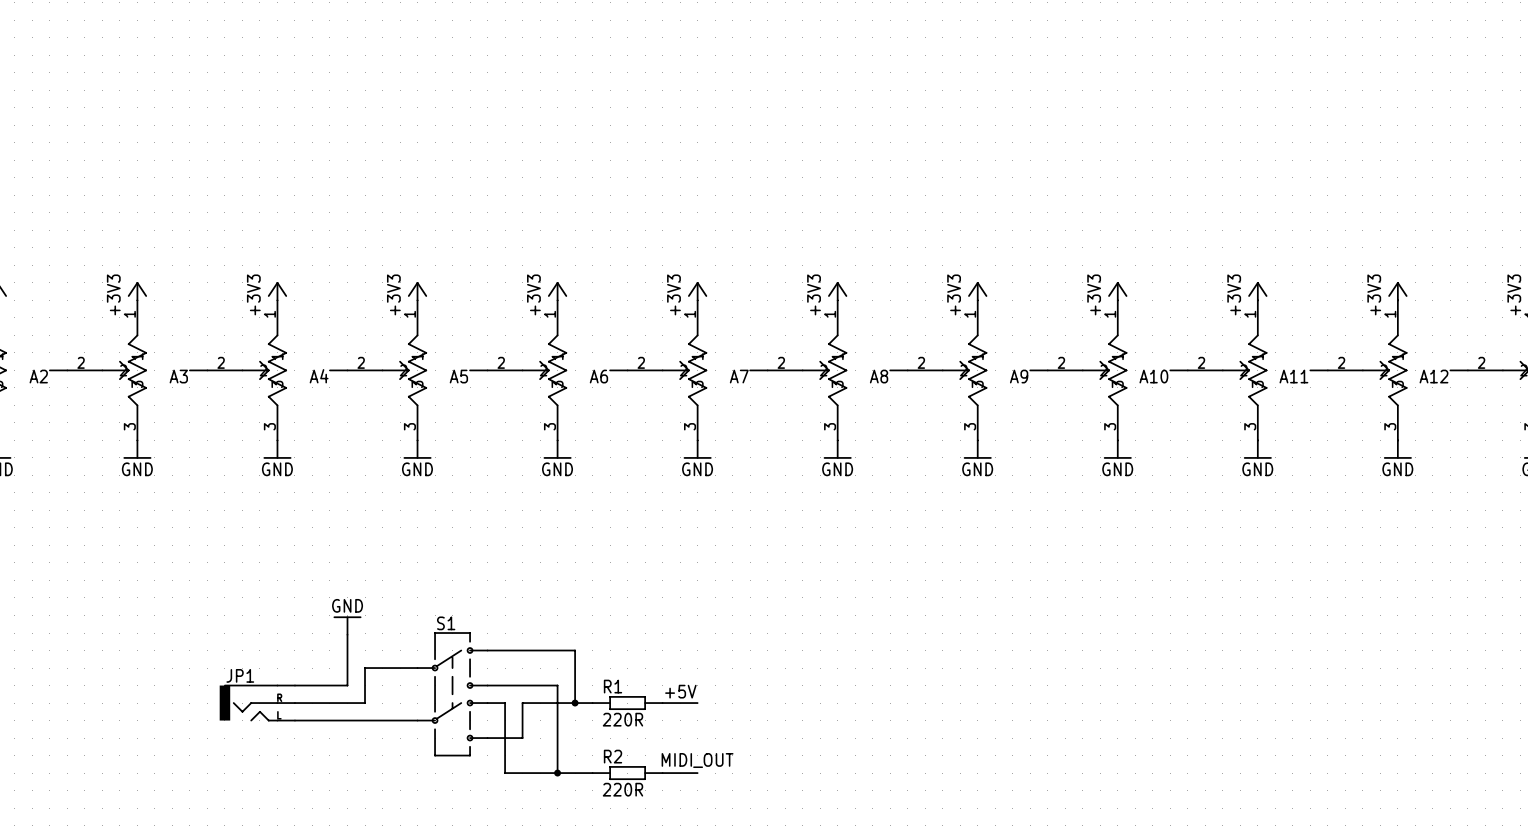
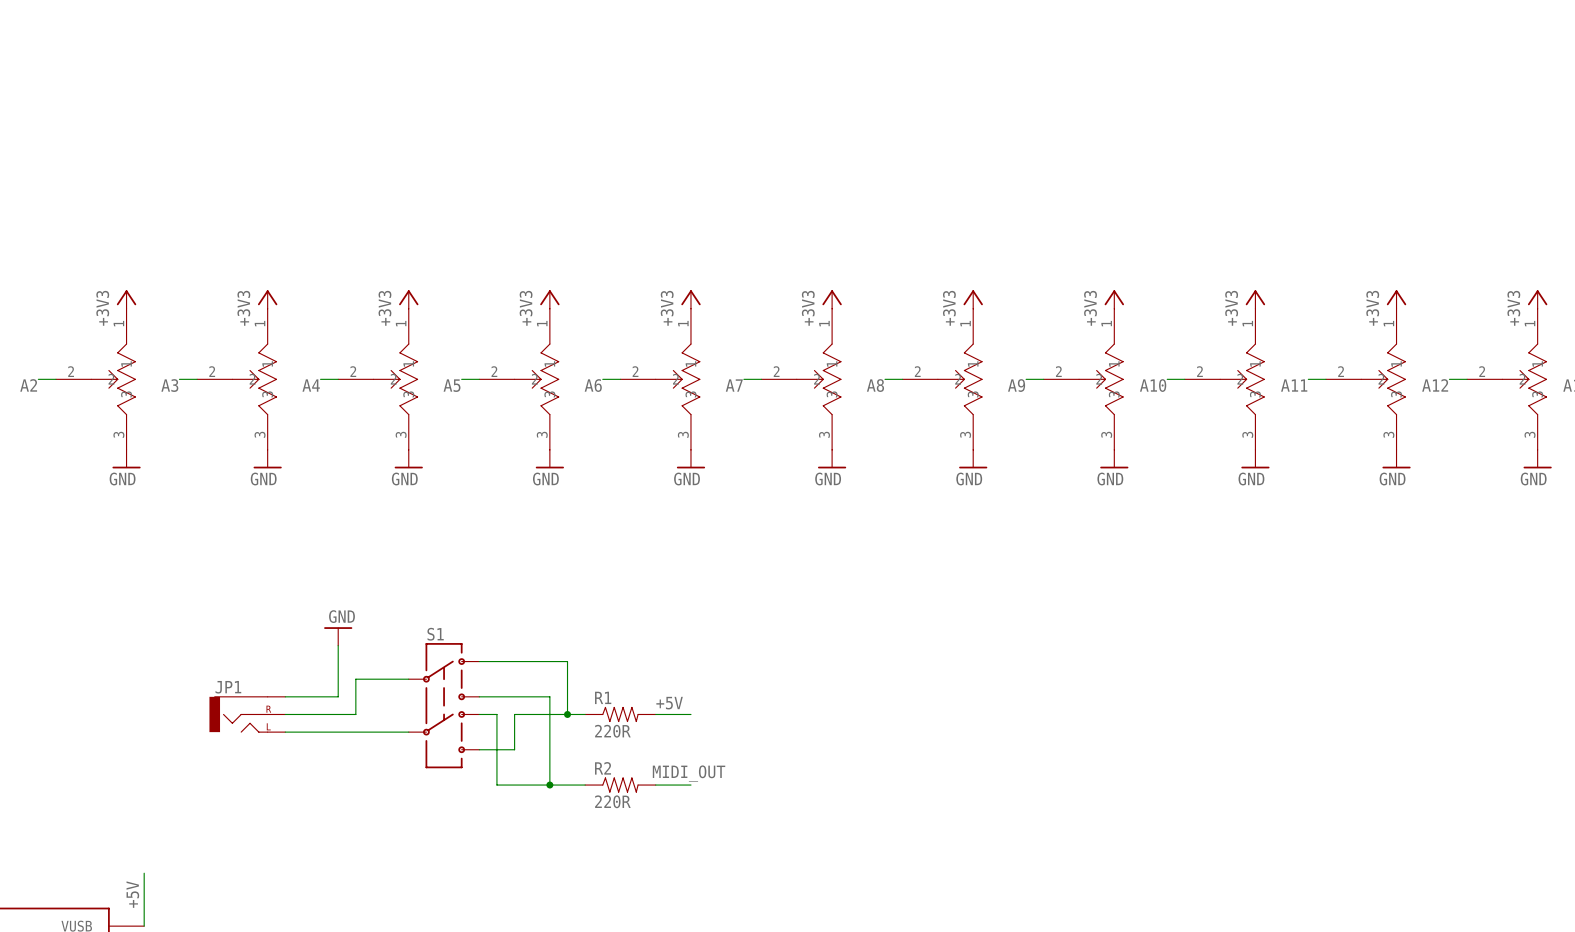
R1 symbol: [592, 696, 663, 711] -> [585, 706, 656, 723]
R2 symbol: [592, 766, 663, 781] -> [585, 777, 656, 793]

